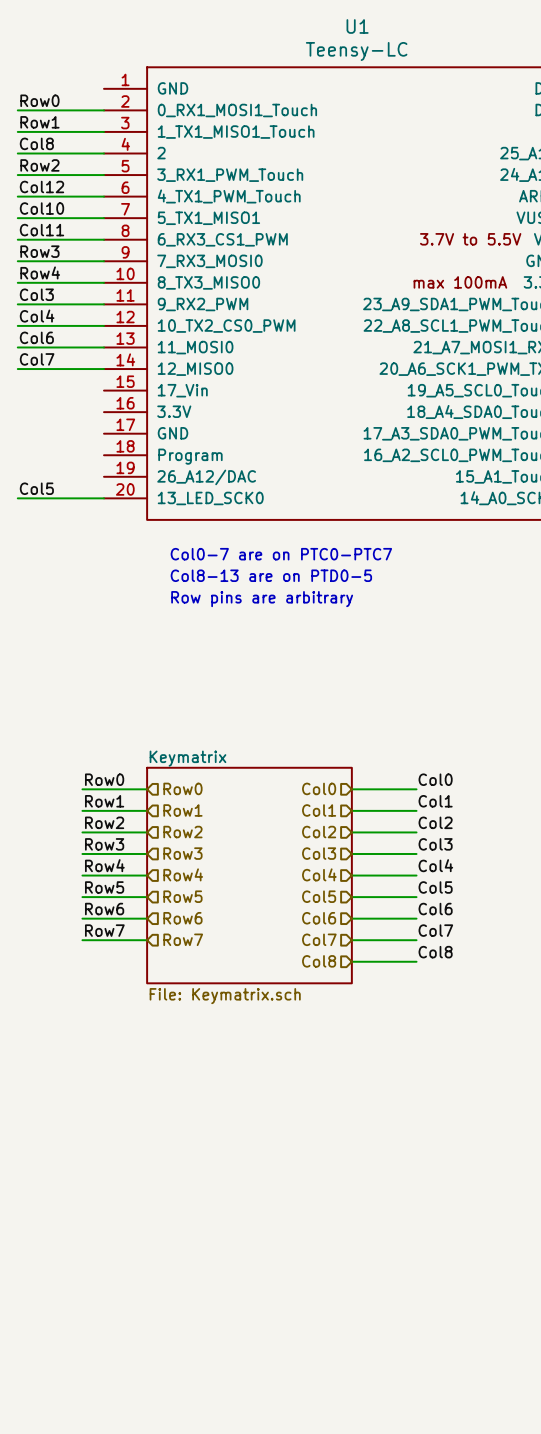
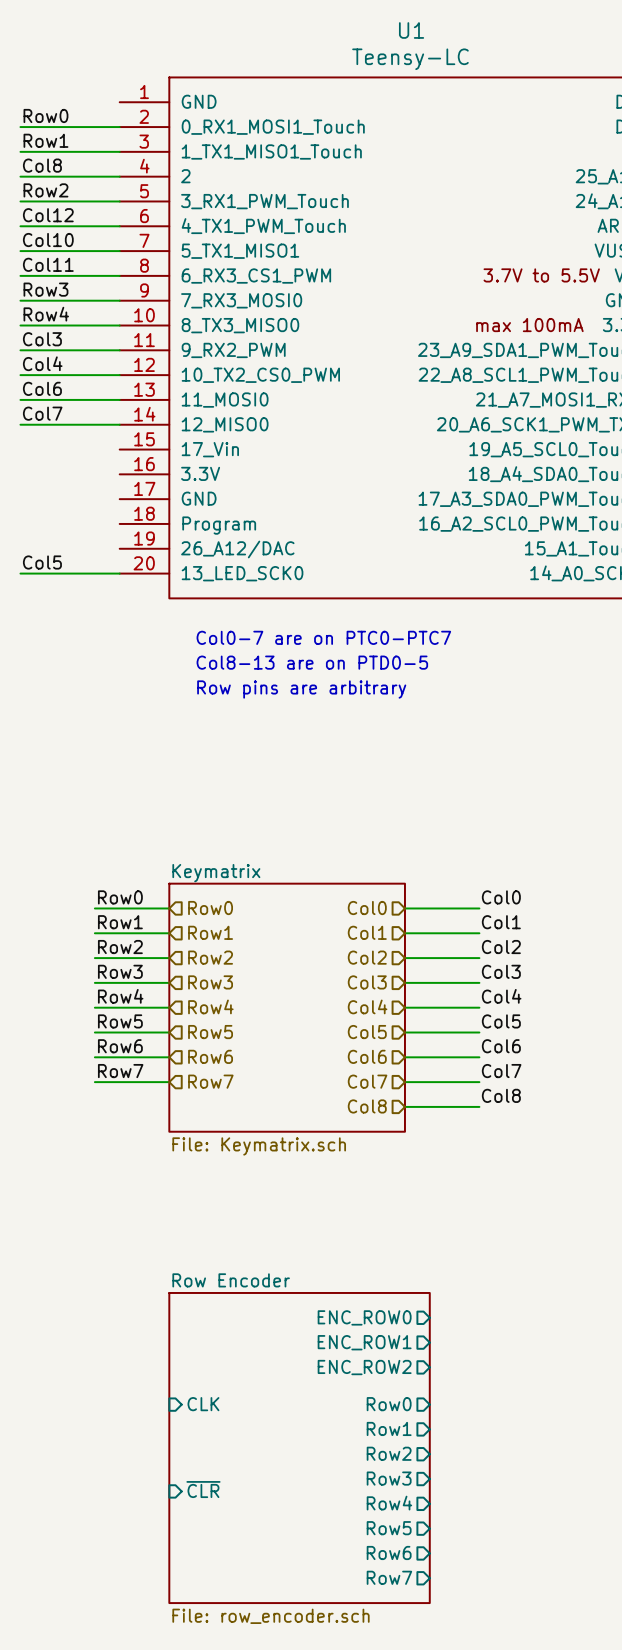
sheet pin: none -> ENC_ROW0 (364, 1317)
sheet pin: none -> ENC_ROW1 (364, 1342)
sheet pin: none -> ENC_ROW2 (364, 1367)
sheet pin: none -> CLK (203, 1404)
sheet pin: none -> Row0 (389, 1404)
sheet pin: none -> Row1 (389, 1428)
sheet Row Encoder: none -> File: row_encoder.sch (299, 1448)
sheet pin: none -> Row2 (389, 1453)
sheet pin: none -> Row3 (389, 1478)
sheet pin: none -> ~{CLR} (203, 1489)
sheet pin: none -> Row4 (389, 1503)
sheet pin: none -> Row5 (389, 1528)
sheet pin: none -> Row6 (389, 1552)
sheet pin: none -> Row7 (389, 1577)

